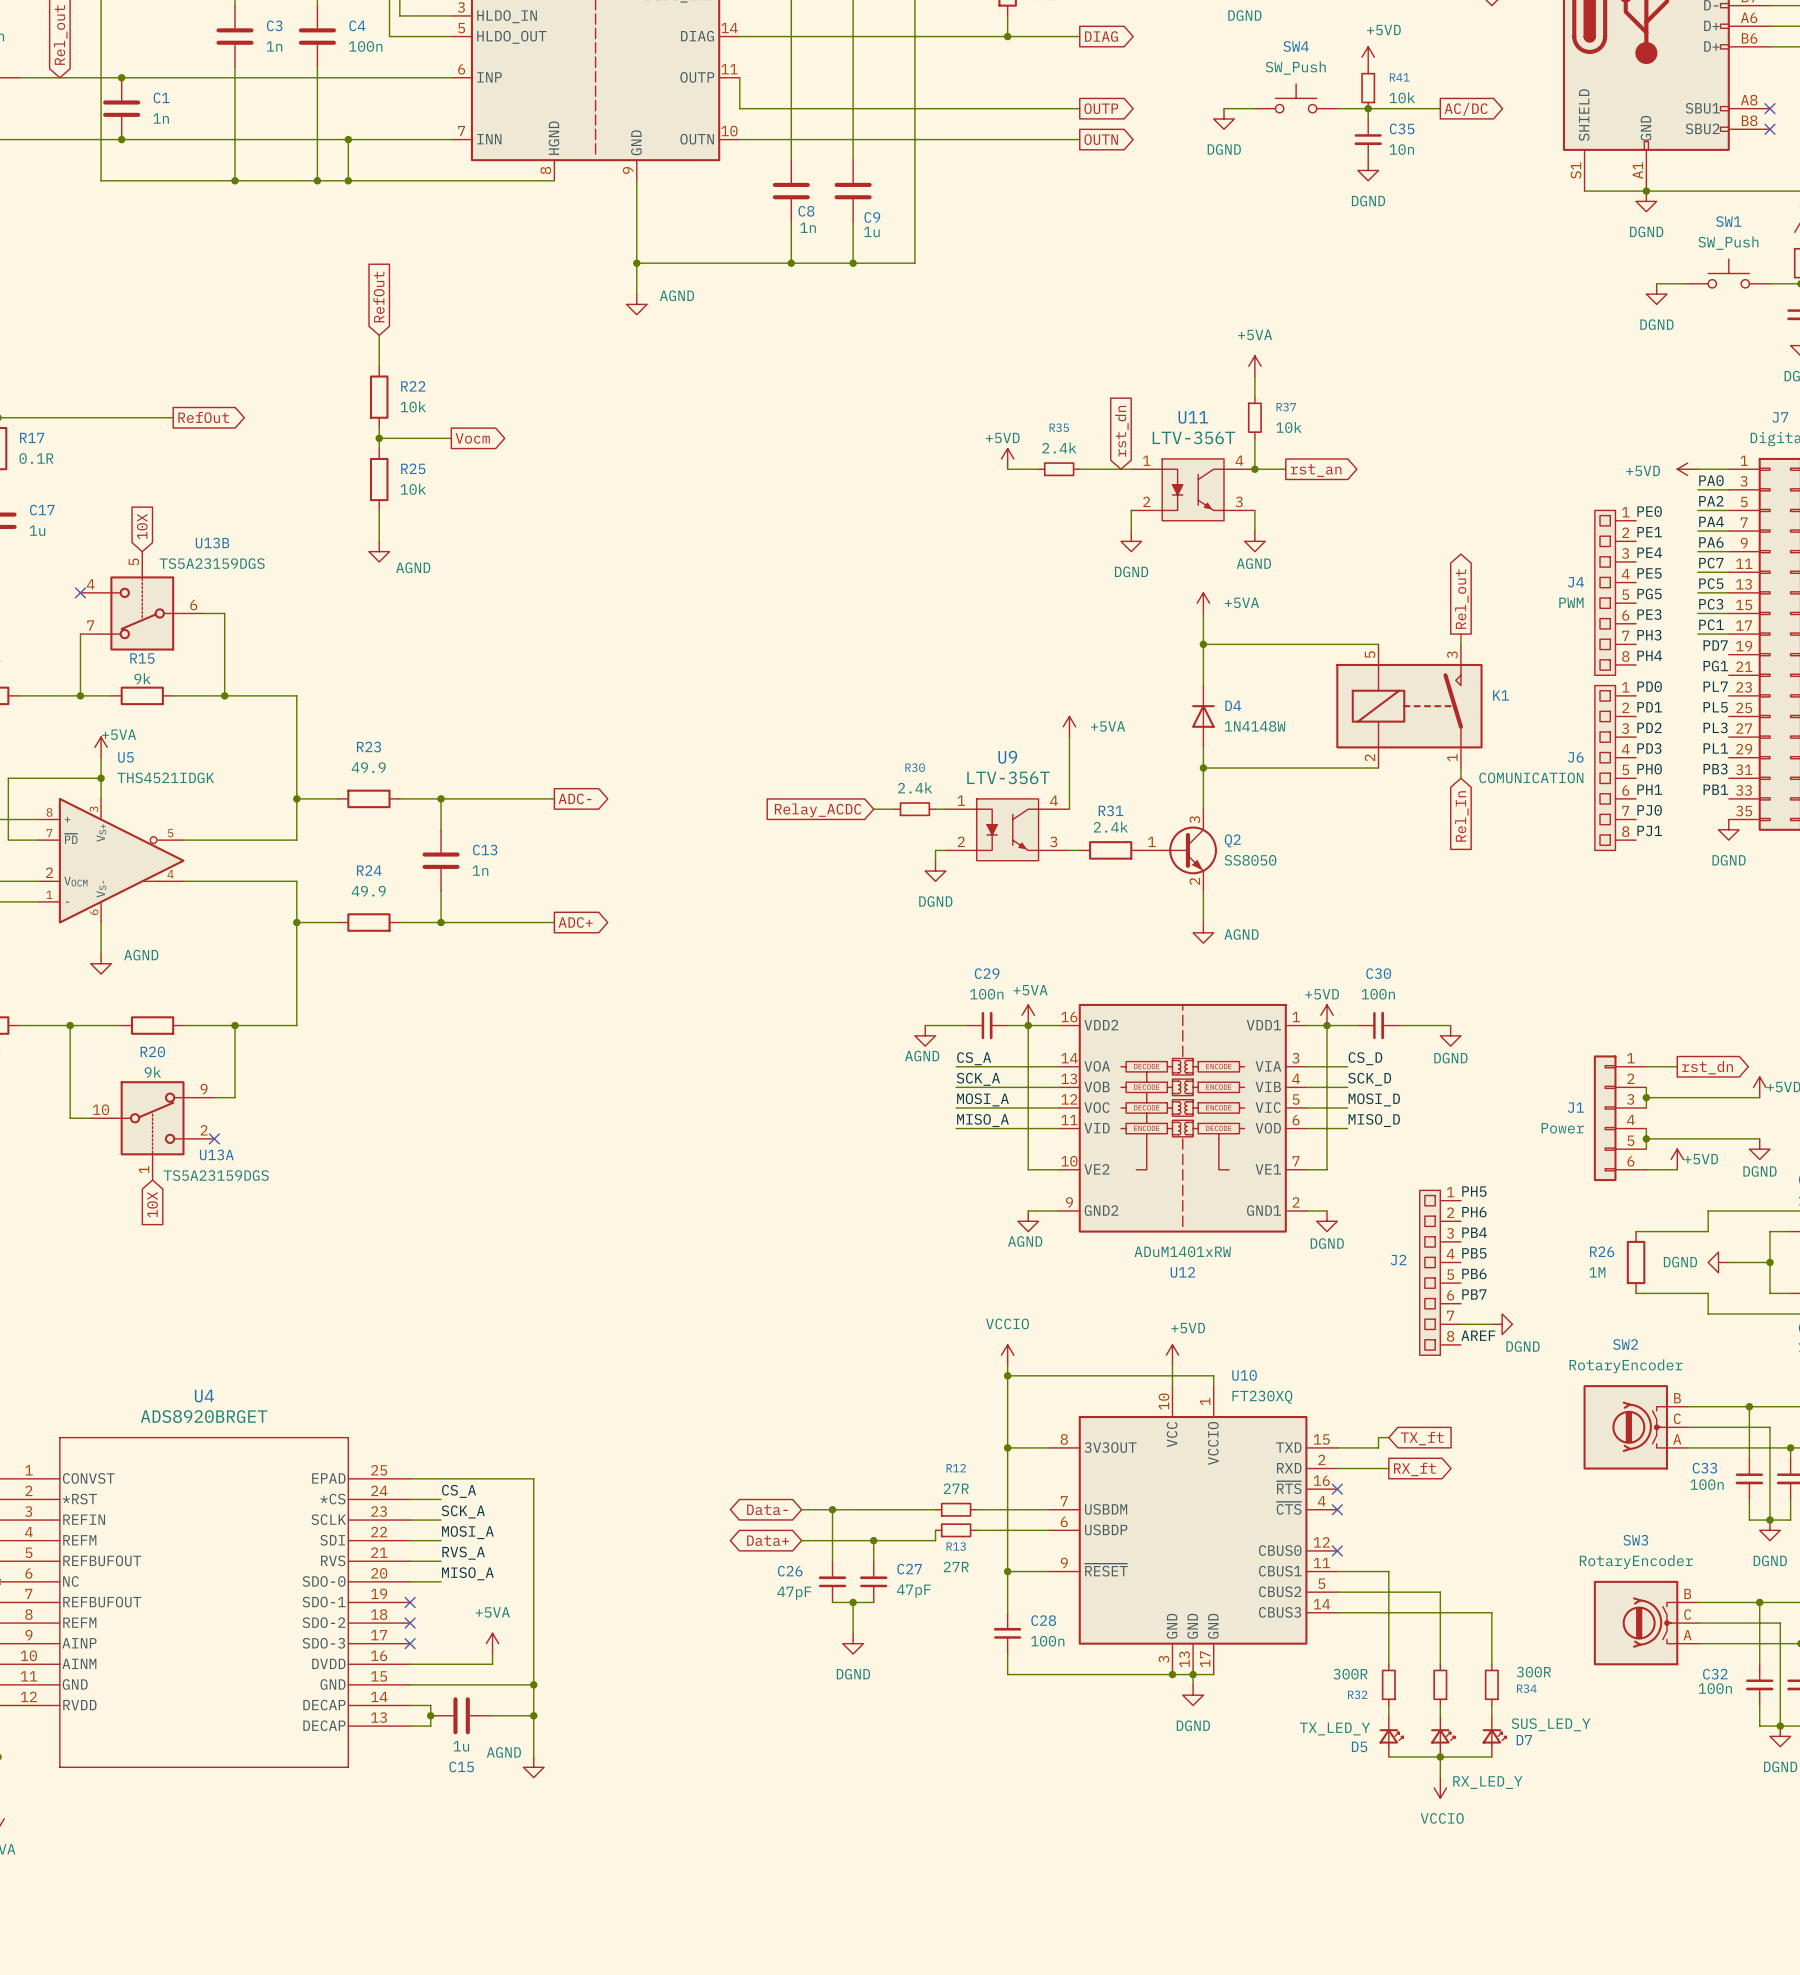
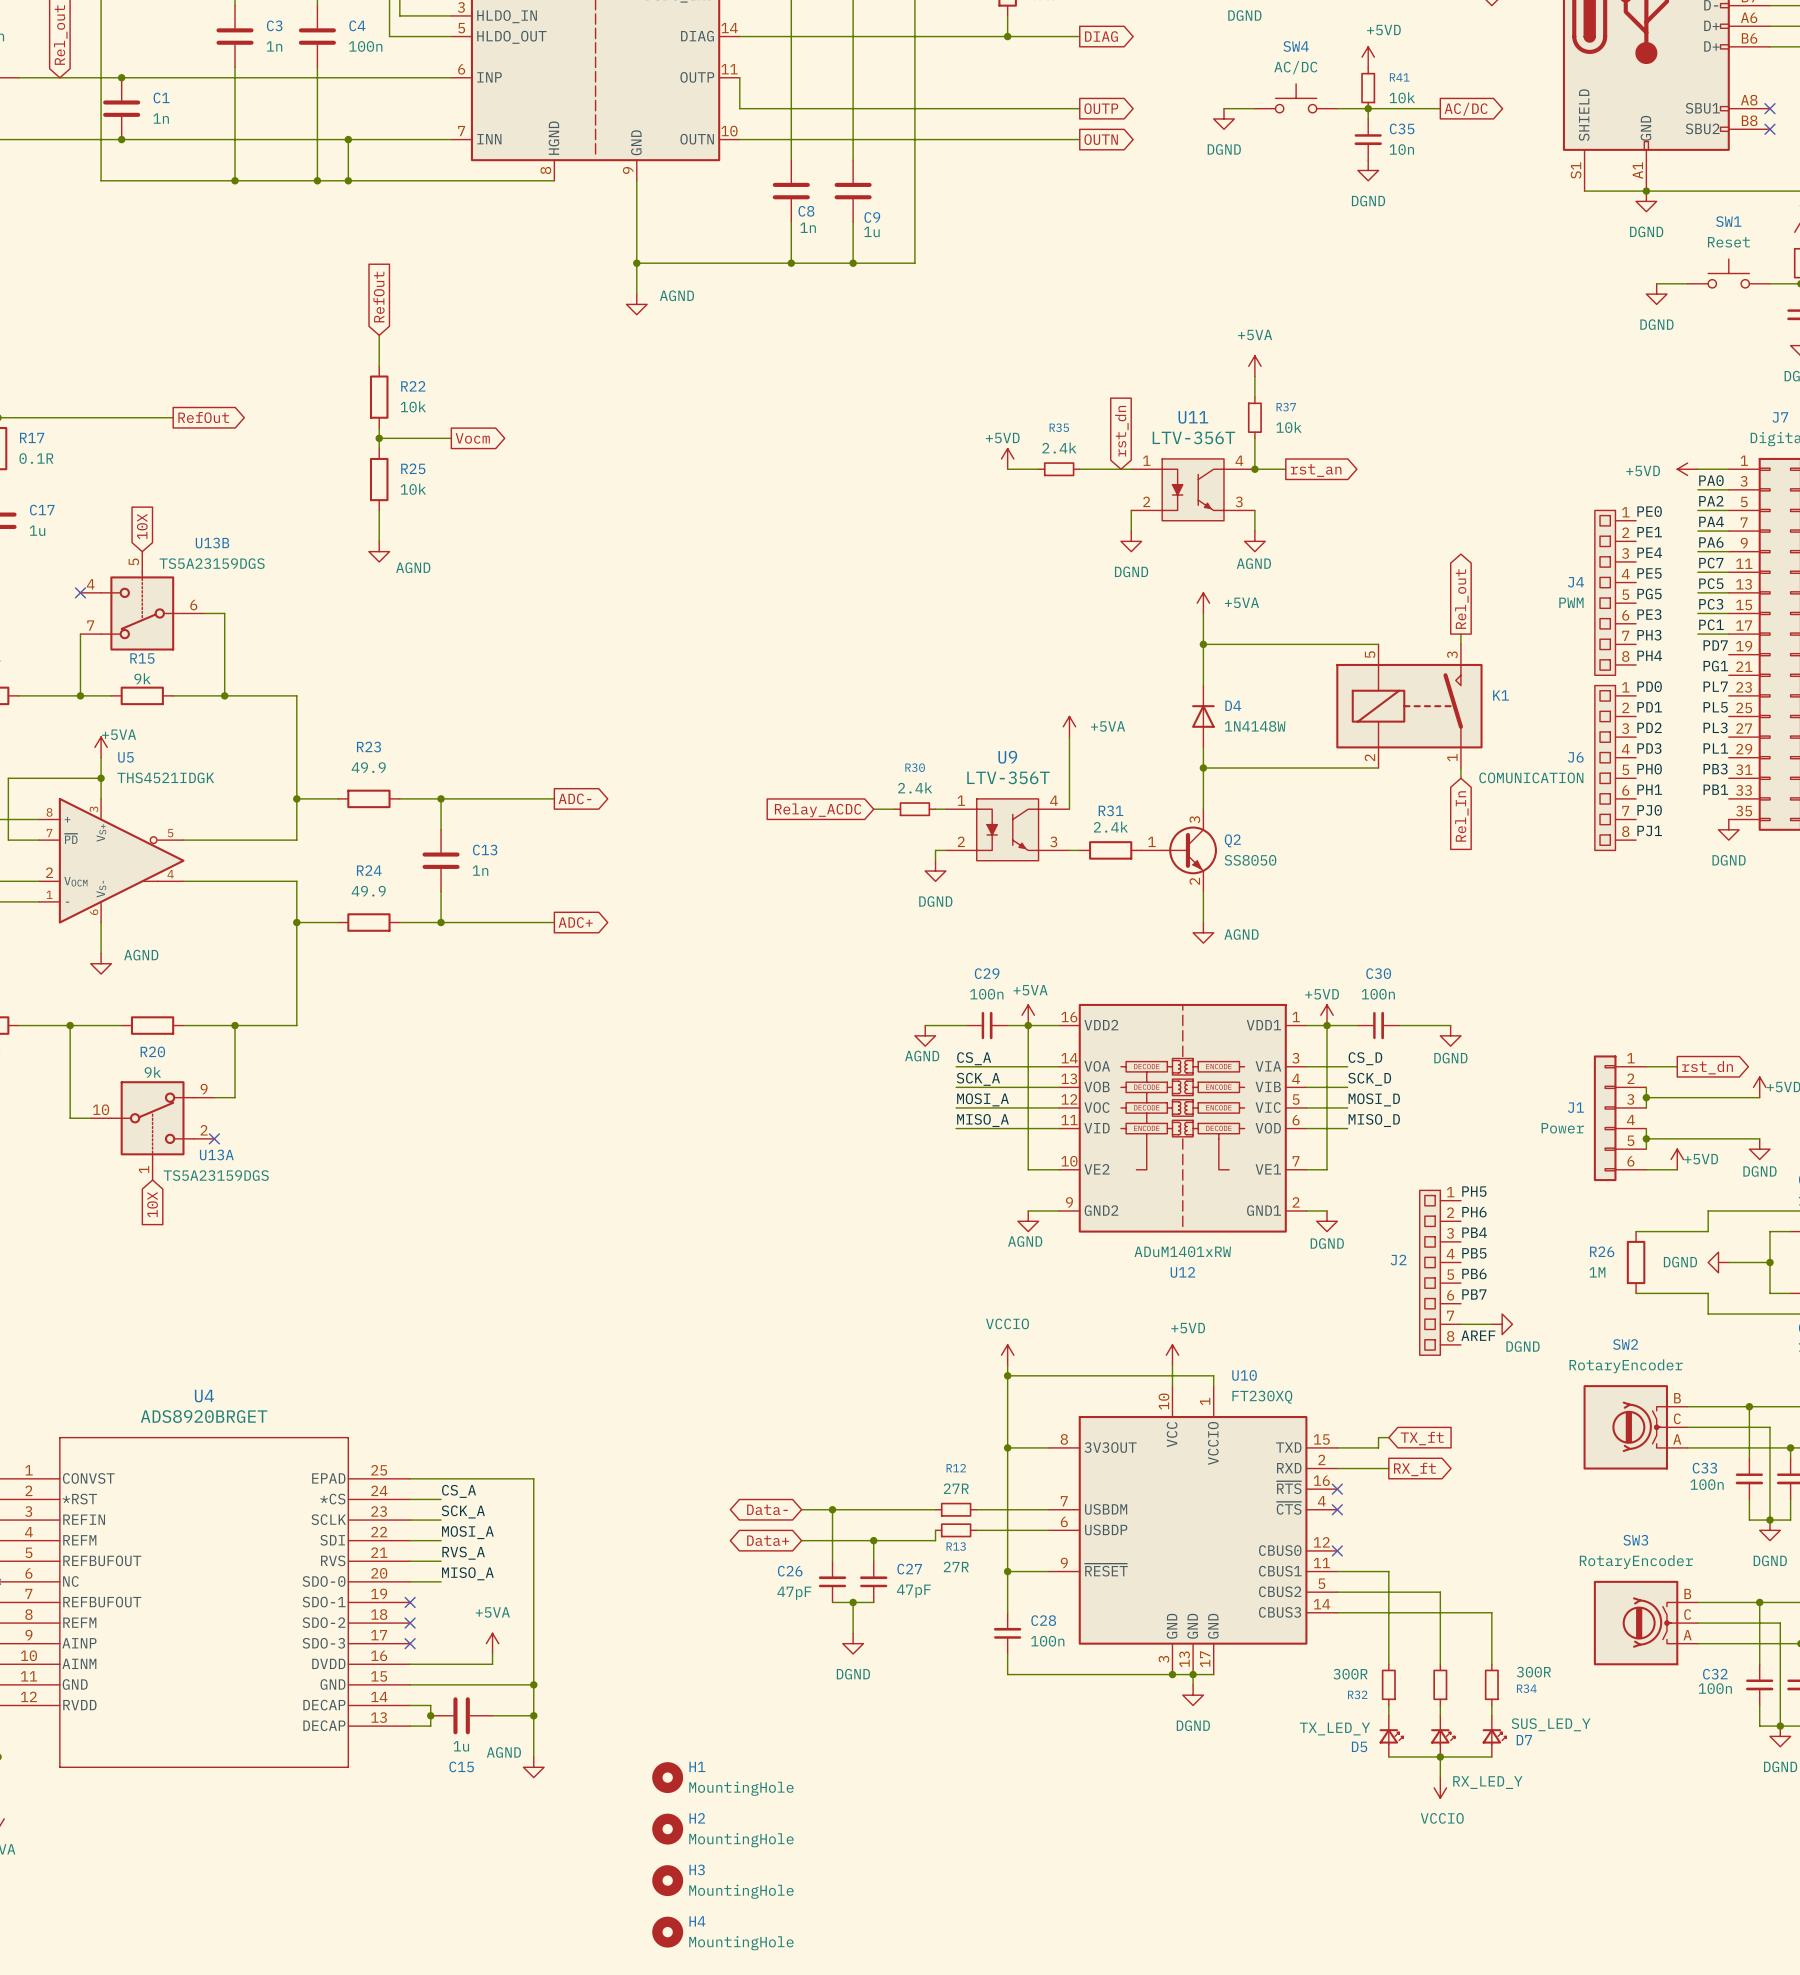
SW4 value: SW_Push (1295, 68) -> AC/DC (1295, 67)
SW1 value: SW_Push (1728, 243) -> Reset (1728, 242)
H1: none -> MountingHole (667, 1777)
H2: none -> MountingHole (667, 1829)
H3: none -> MountingHole (667, 1880)
H4: none -> MountingHole (667, 1932)

